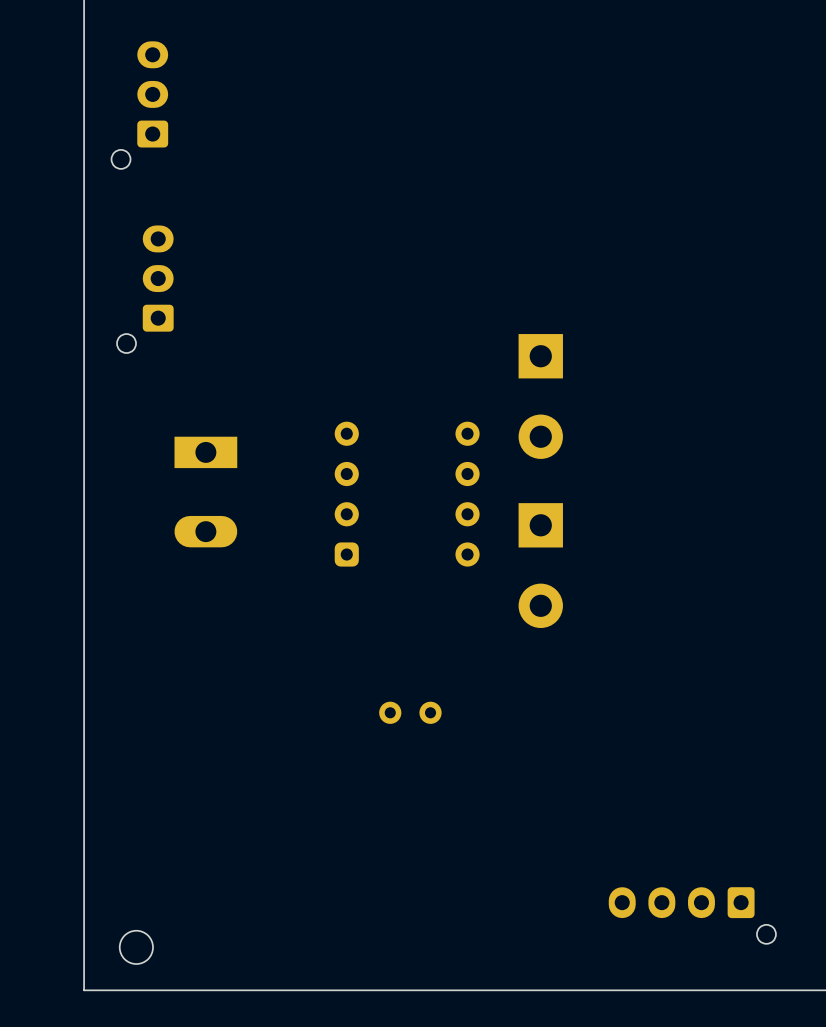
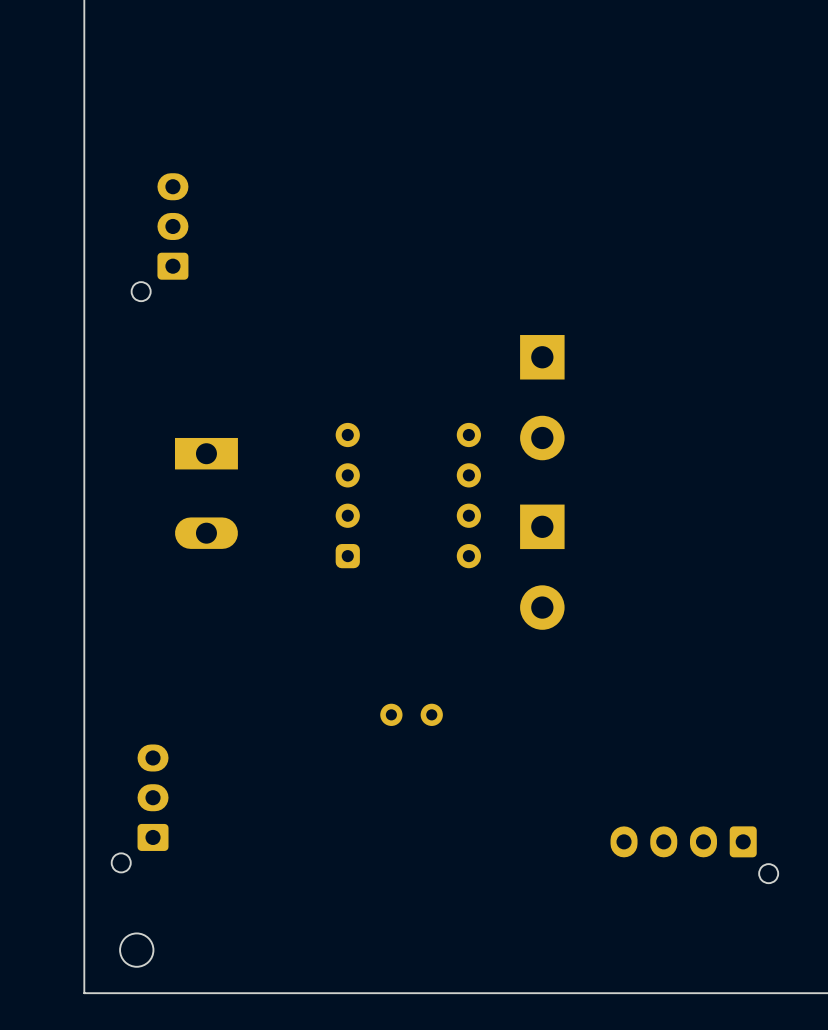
part: (139, 105) -> none
part position: (145, 289) -> (160, 237)
part: none -> (140, 808)
part position: (692, 915) -> (694, 854)

